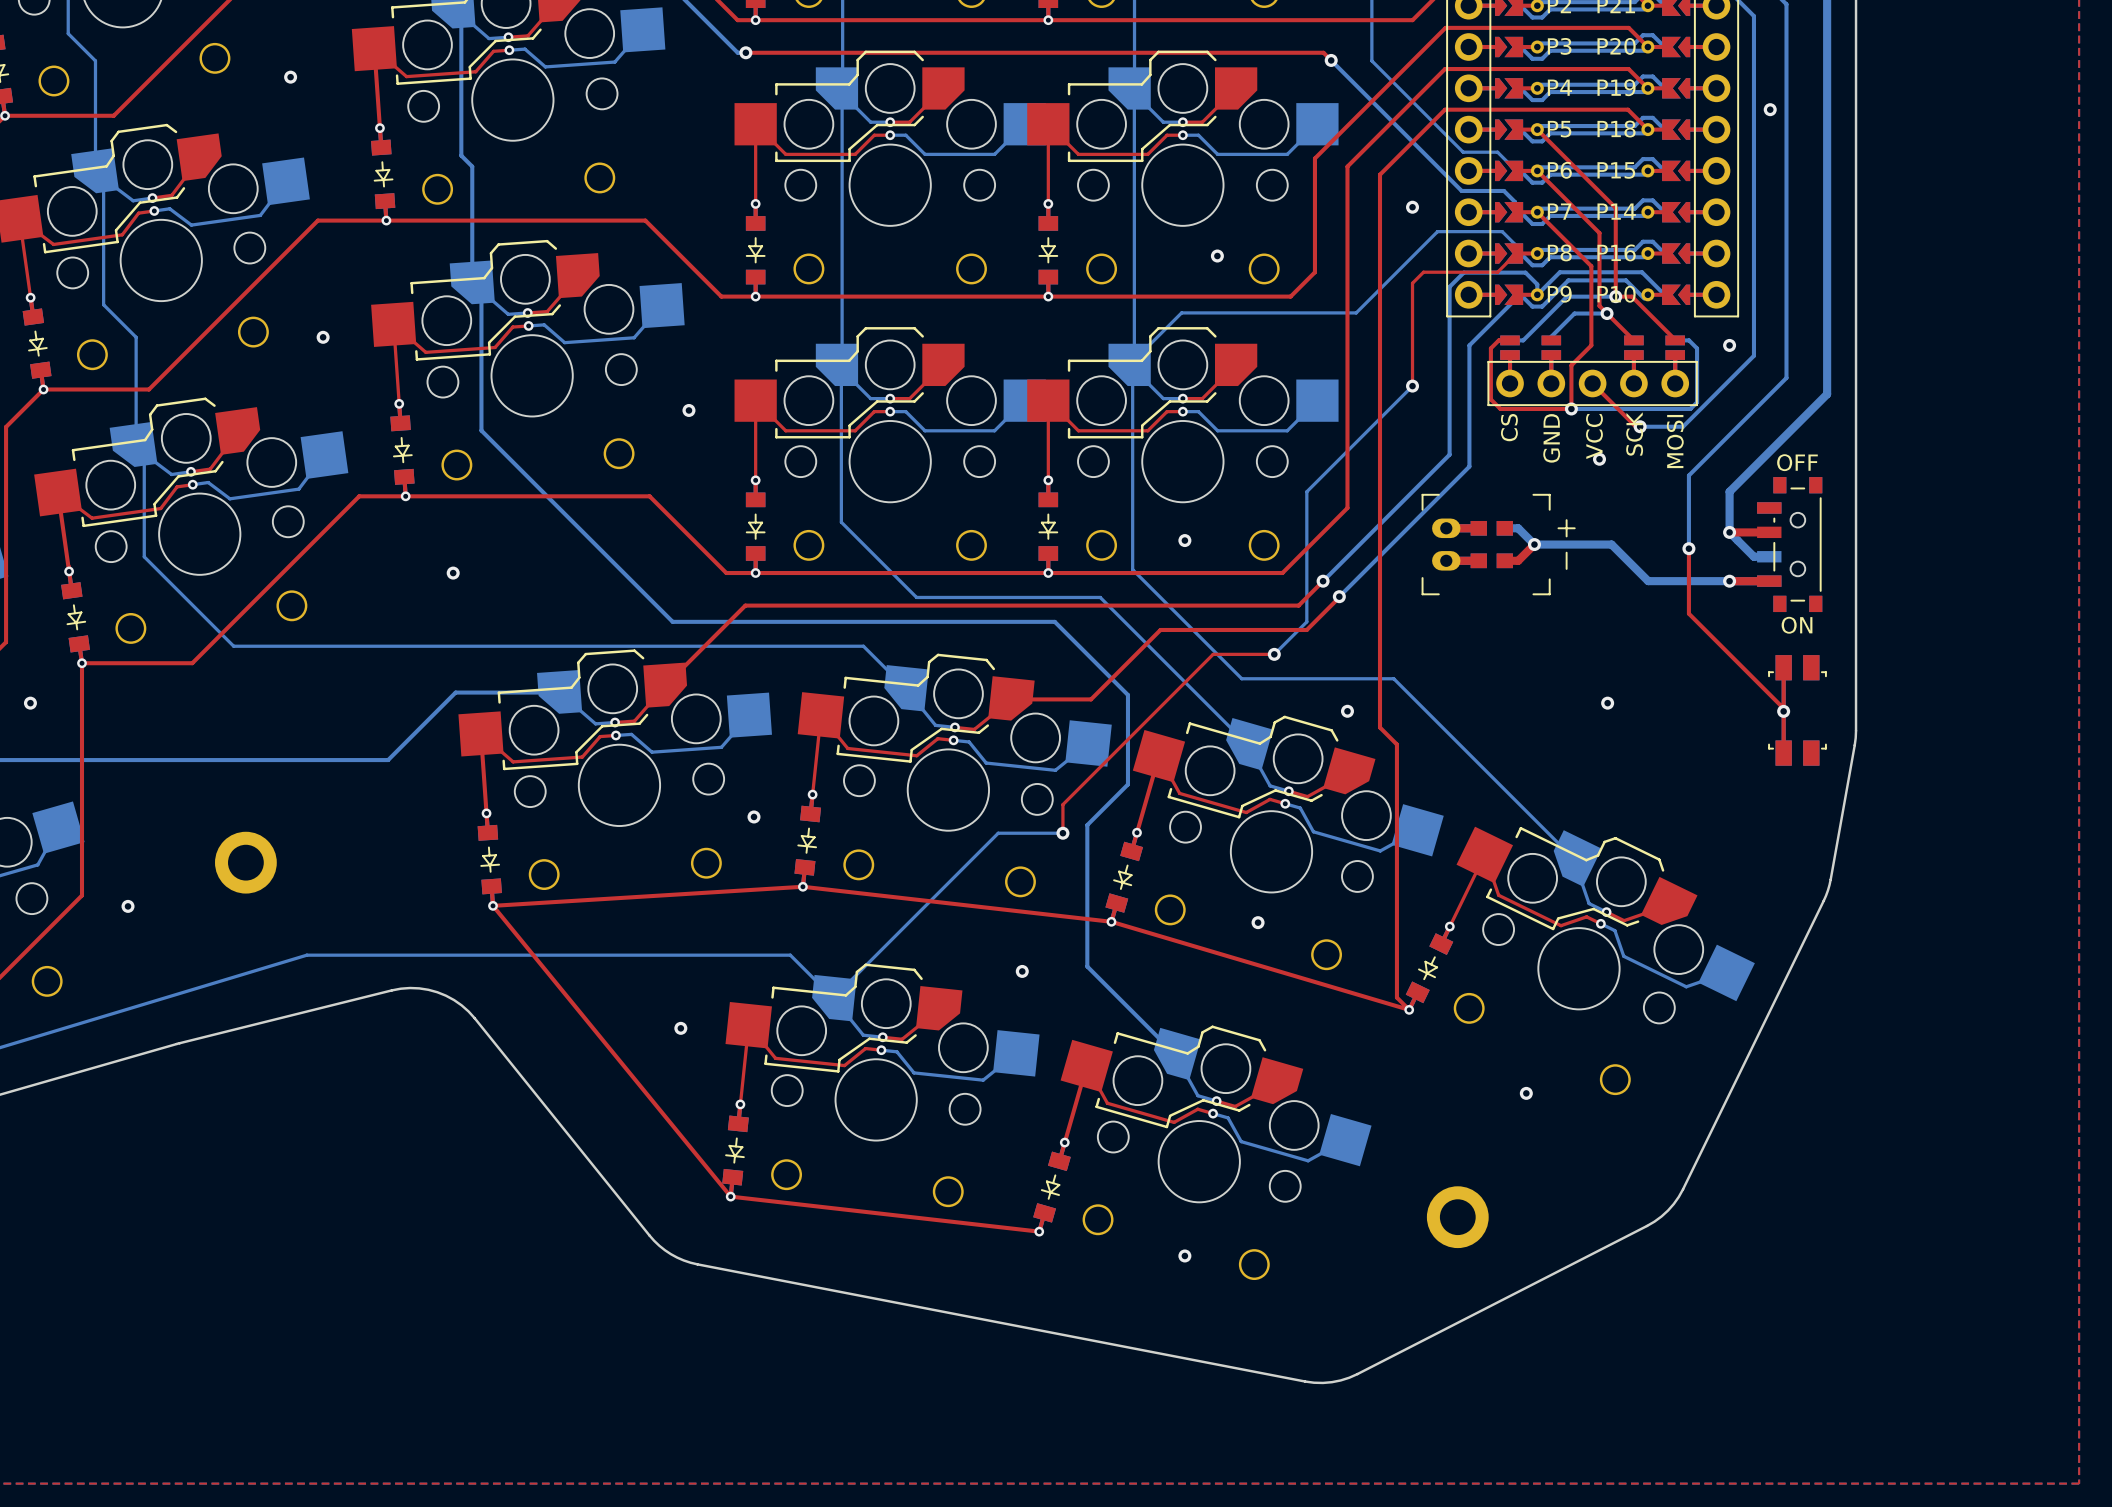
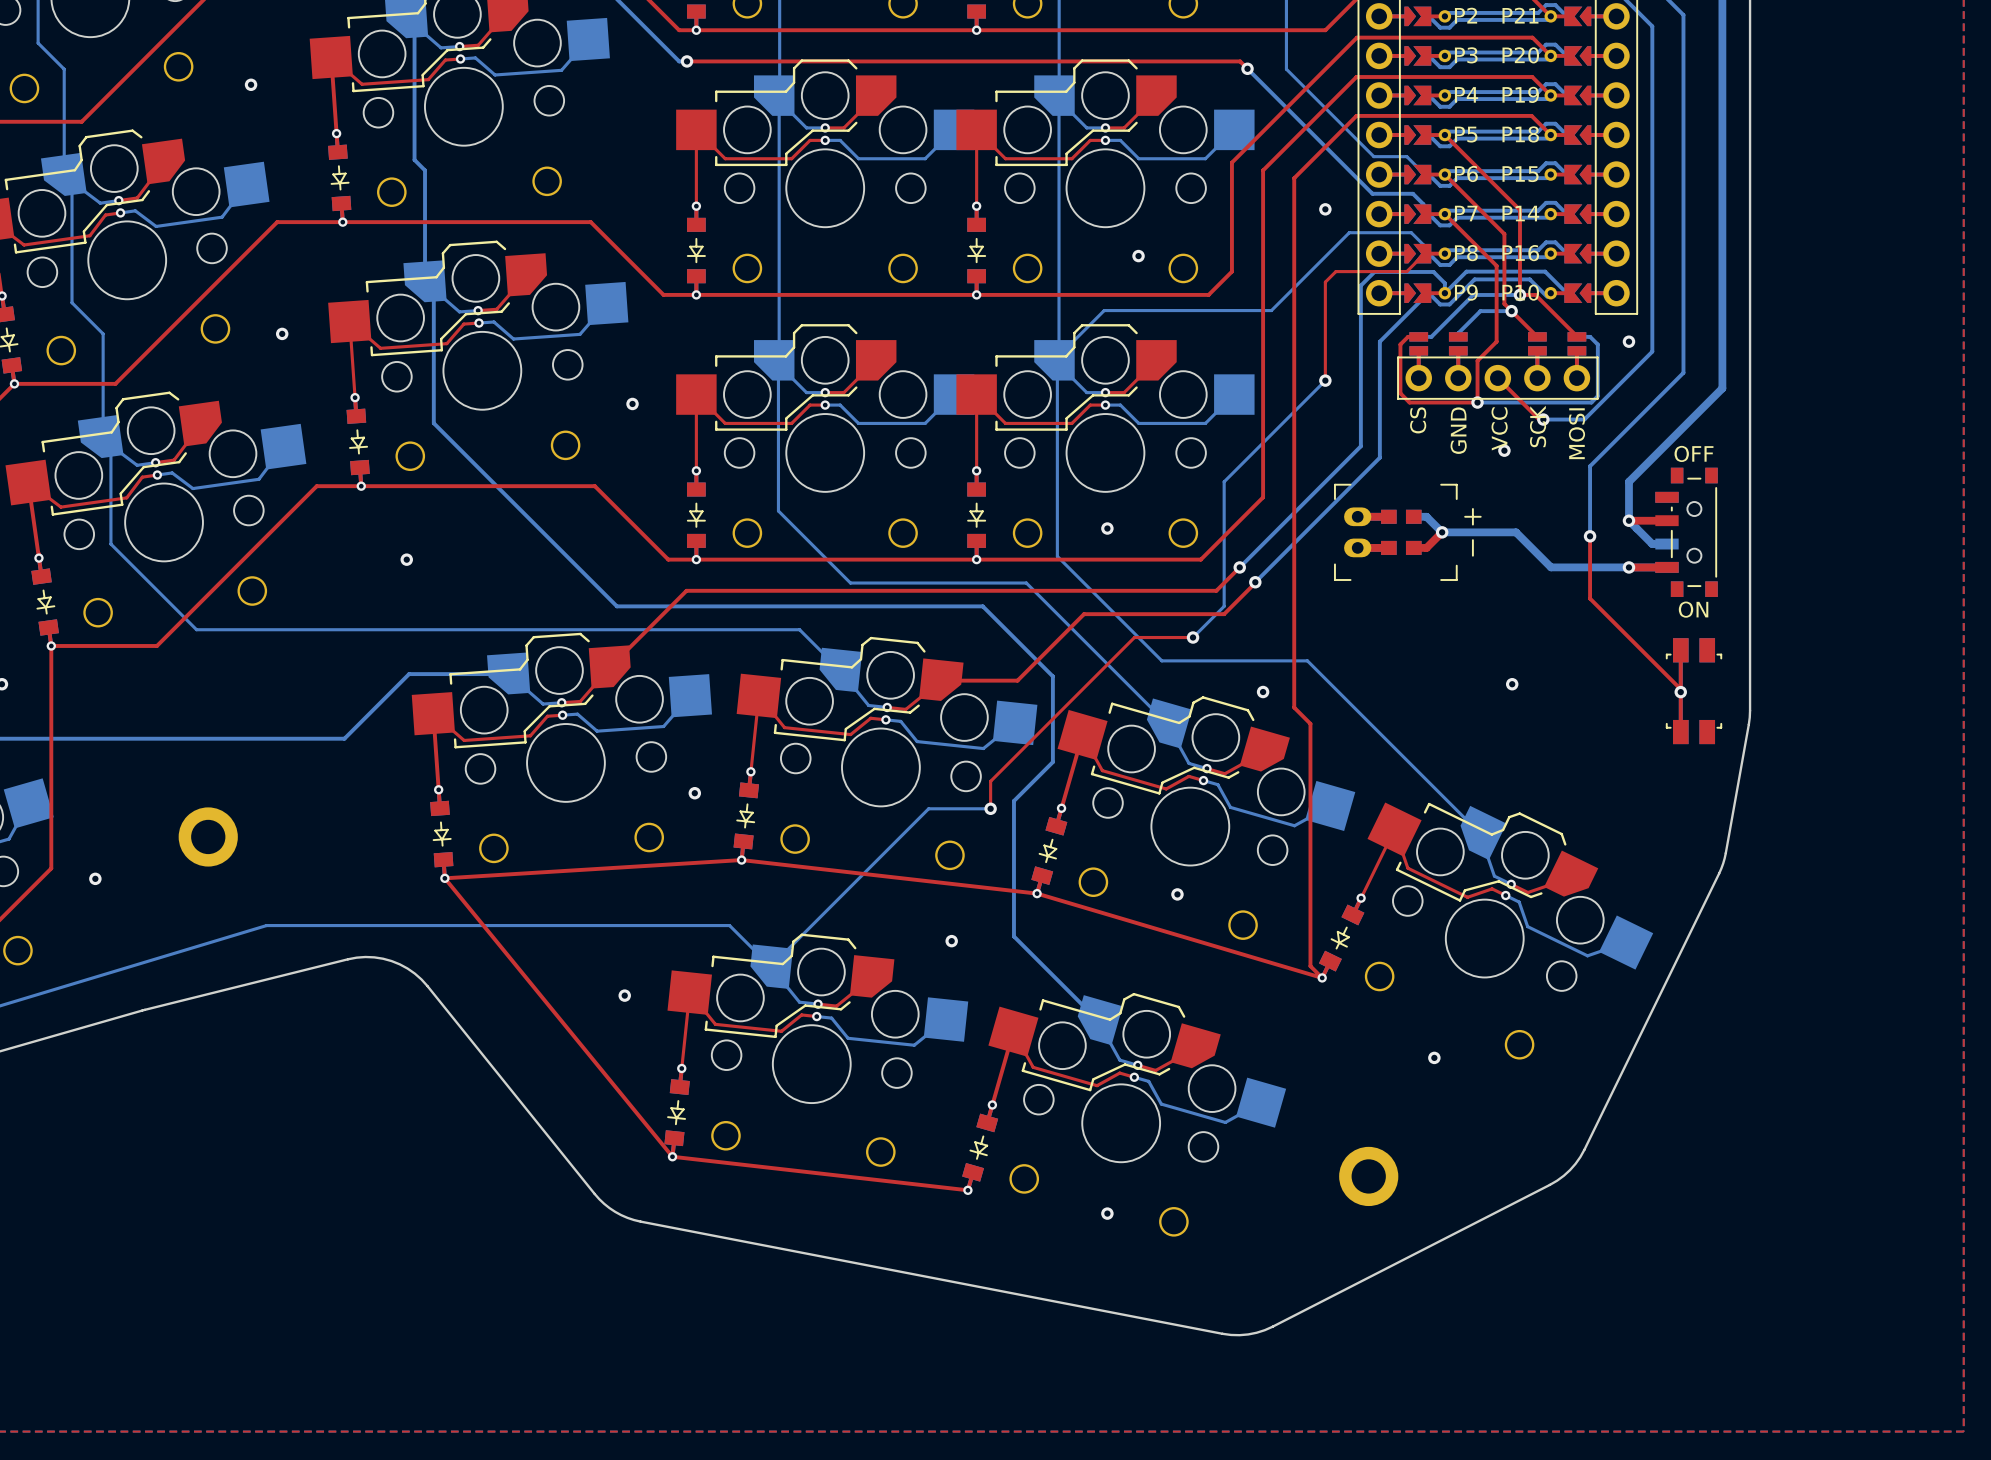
via: (1770, 109) -> none

